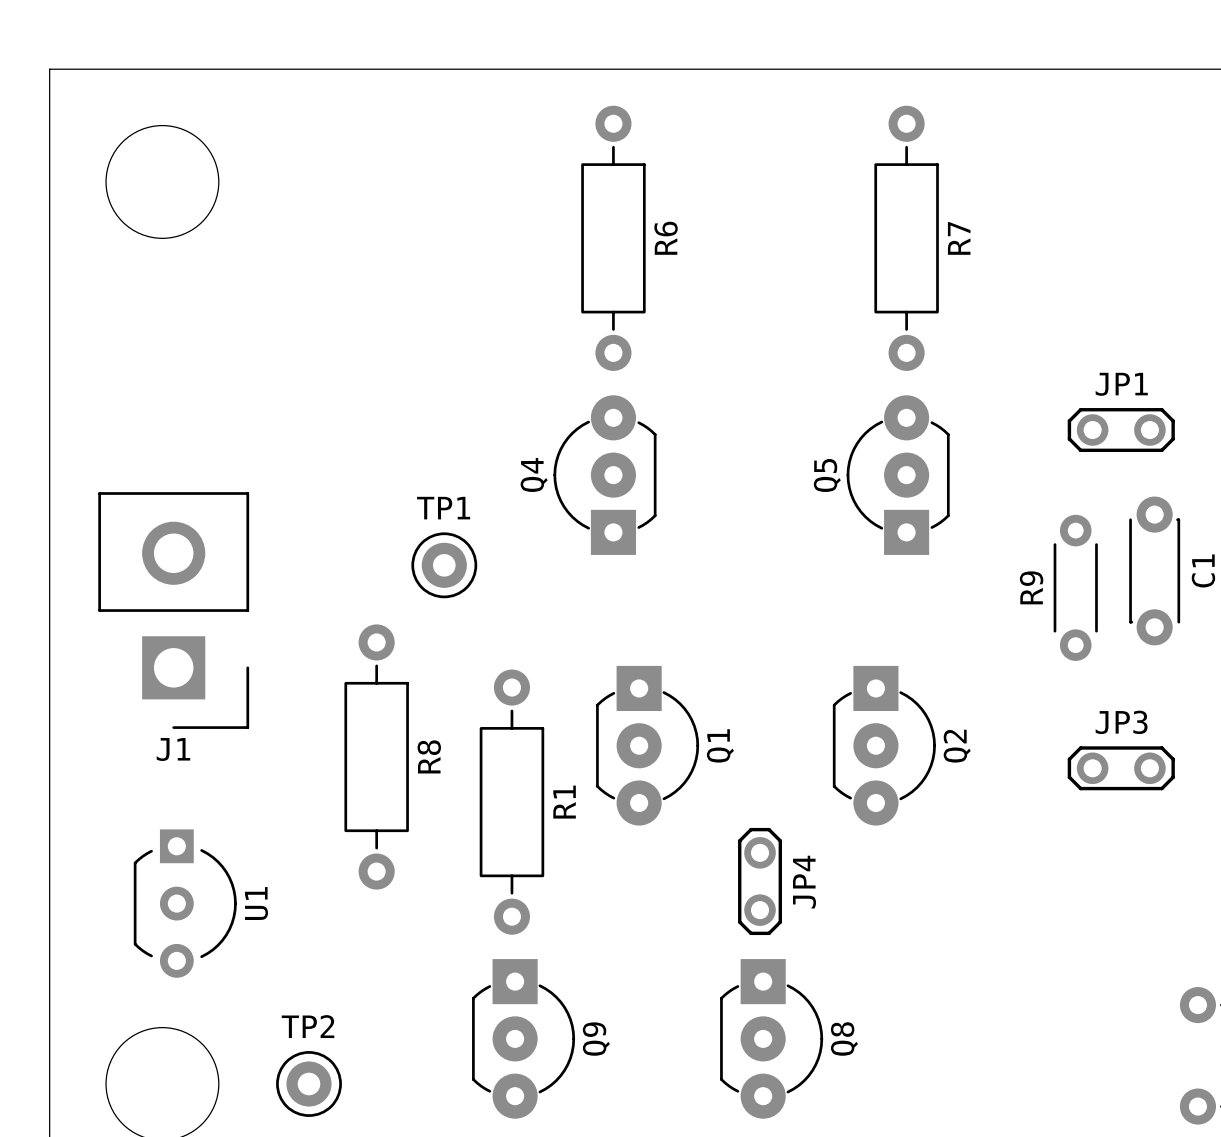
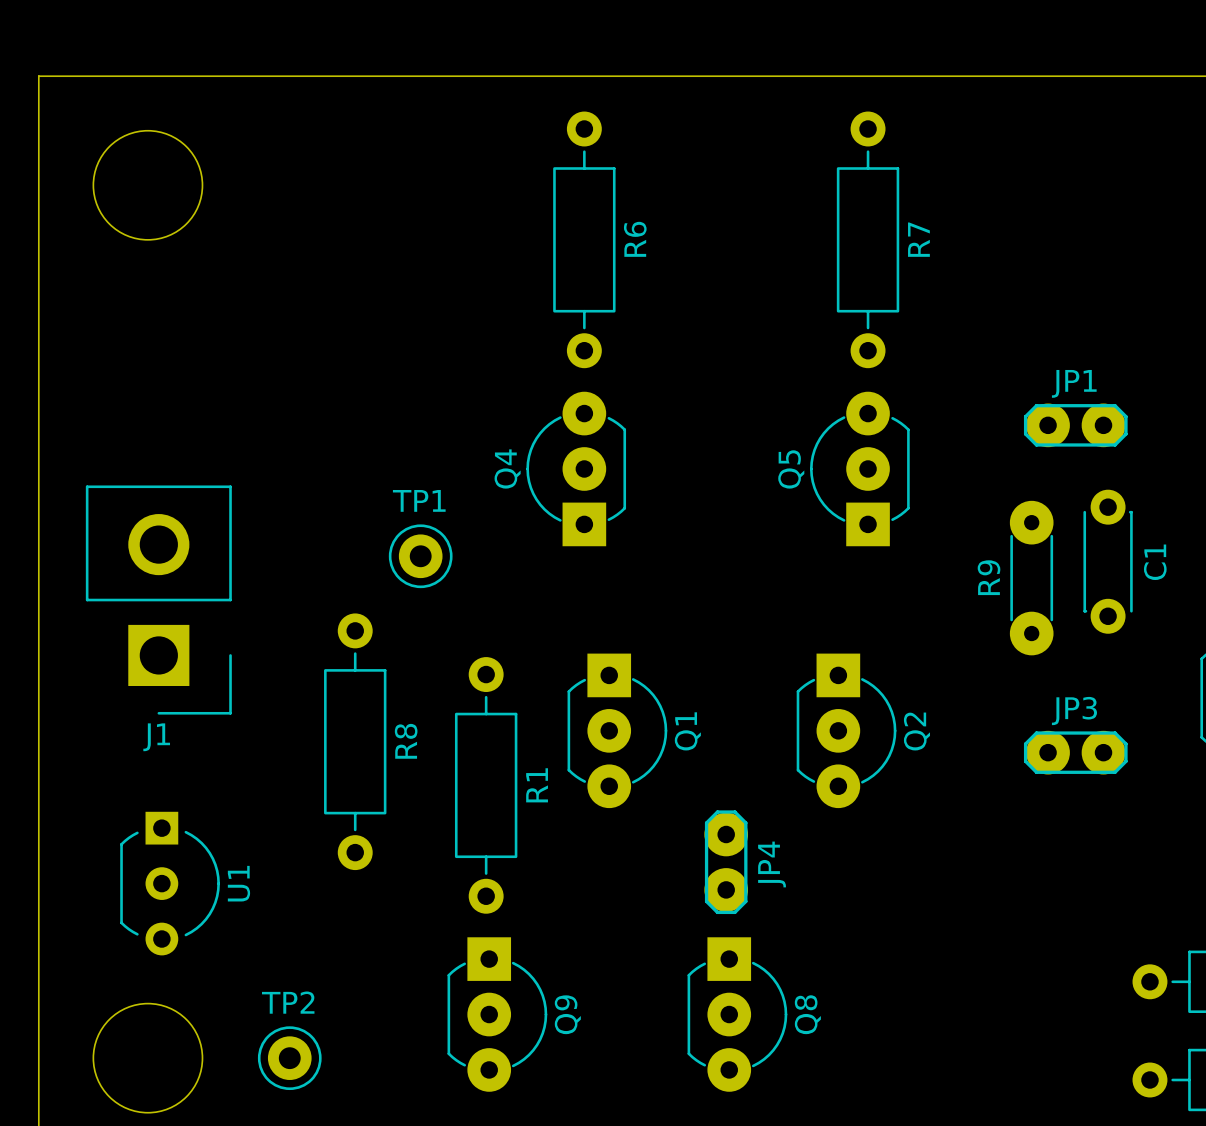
JP1 footprint: [1067, 408, 1175, 453] -> [1023, 403, 1128, 448]
R9 footprint: [1053, 514, 1098, 661] -> [1009, 500, 1054, 656]
JP3 footprint: [1067, 746, 1175, 791] -> [1023, 730, 1128, 775]
JP4 footprint: [738, 827, 783, 936] -> [704, 810, 749, 915]

